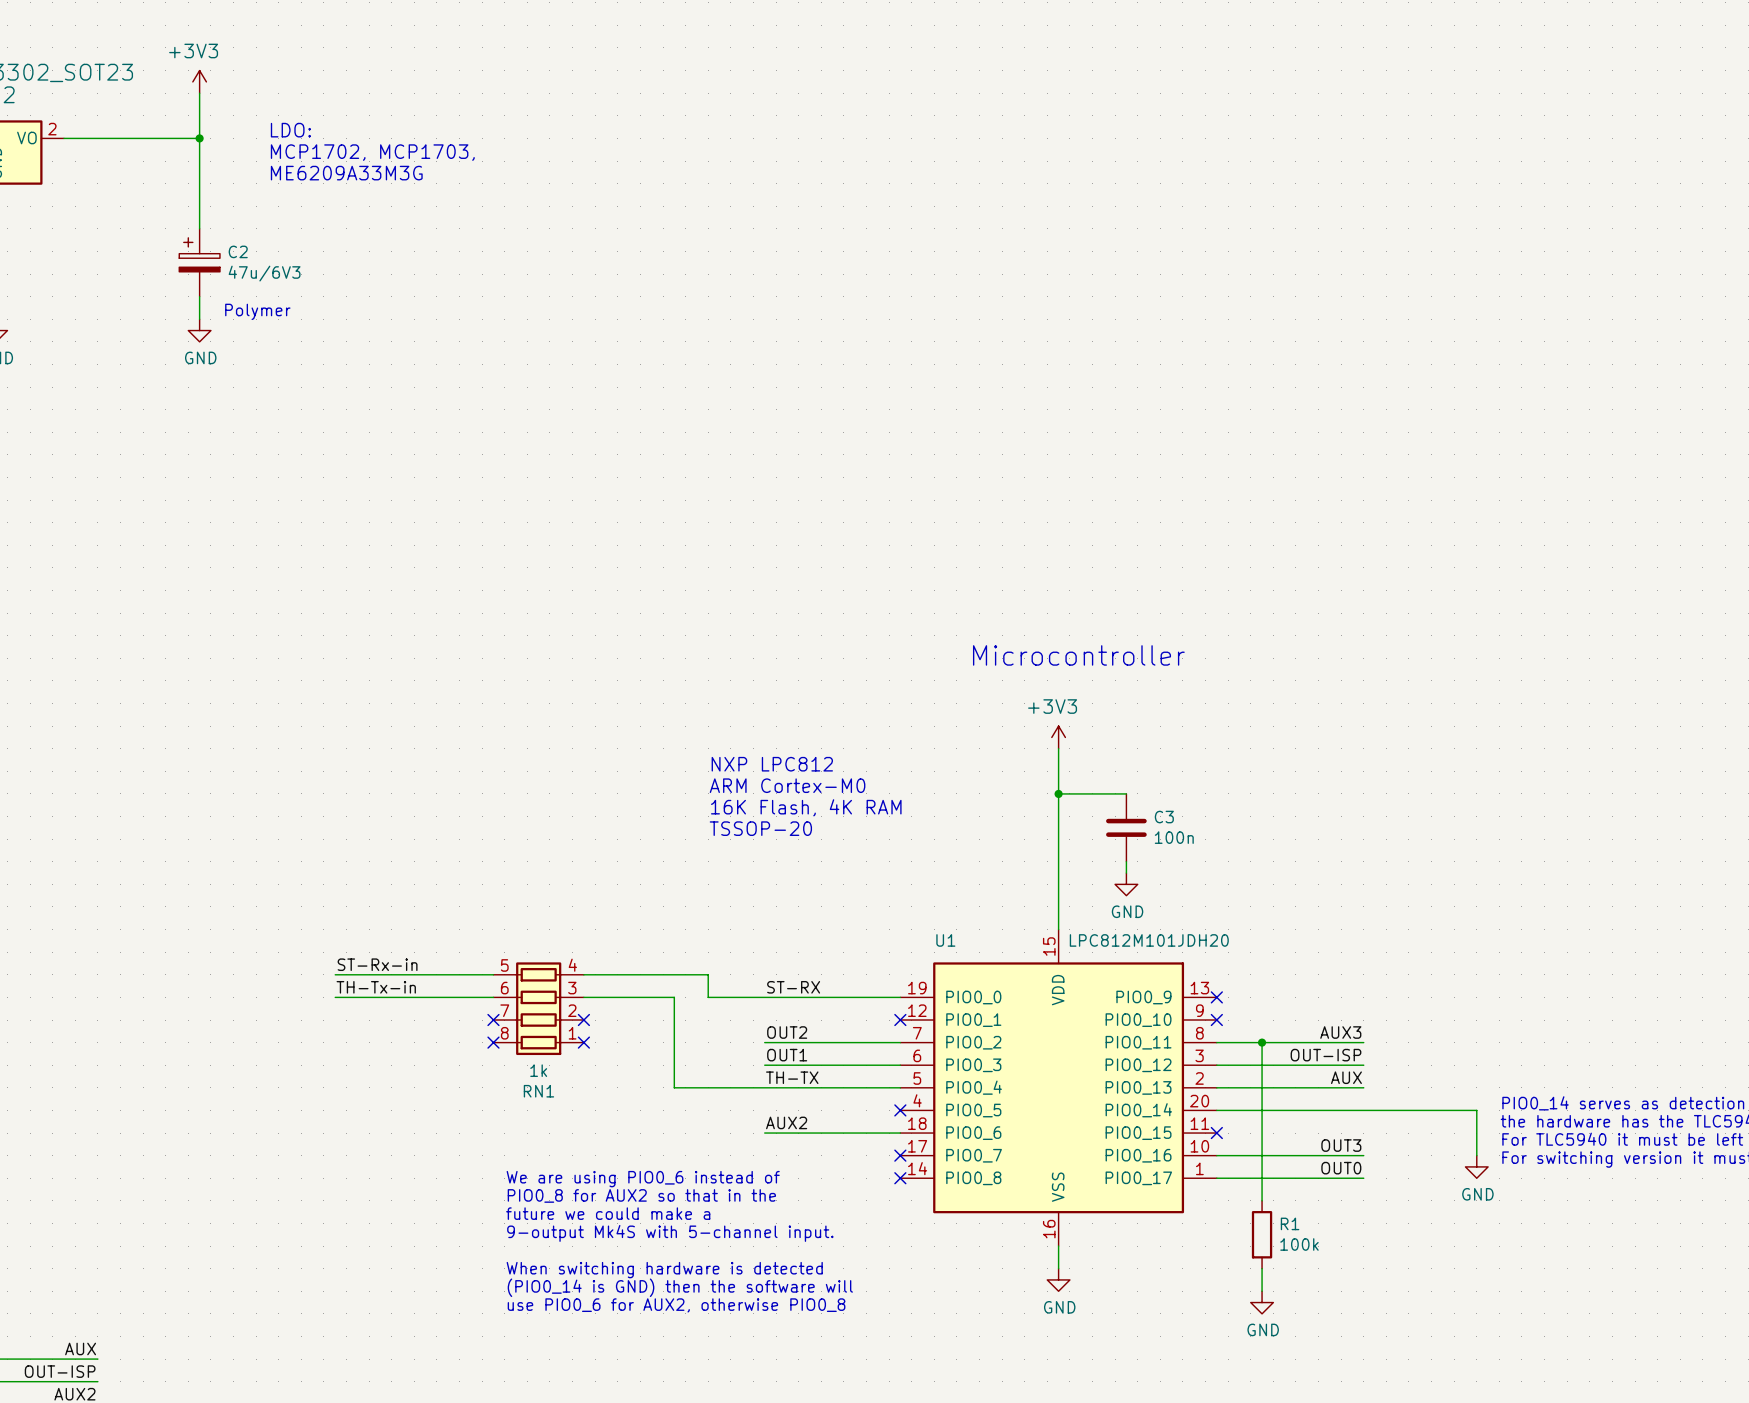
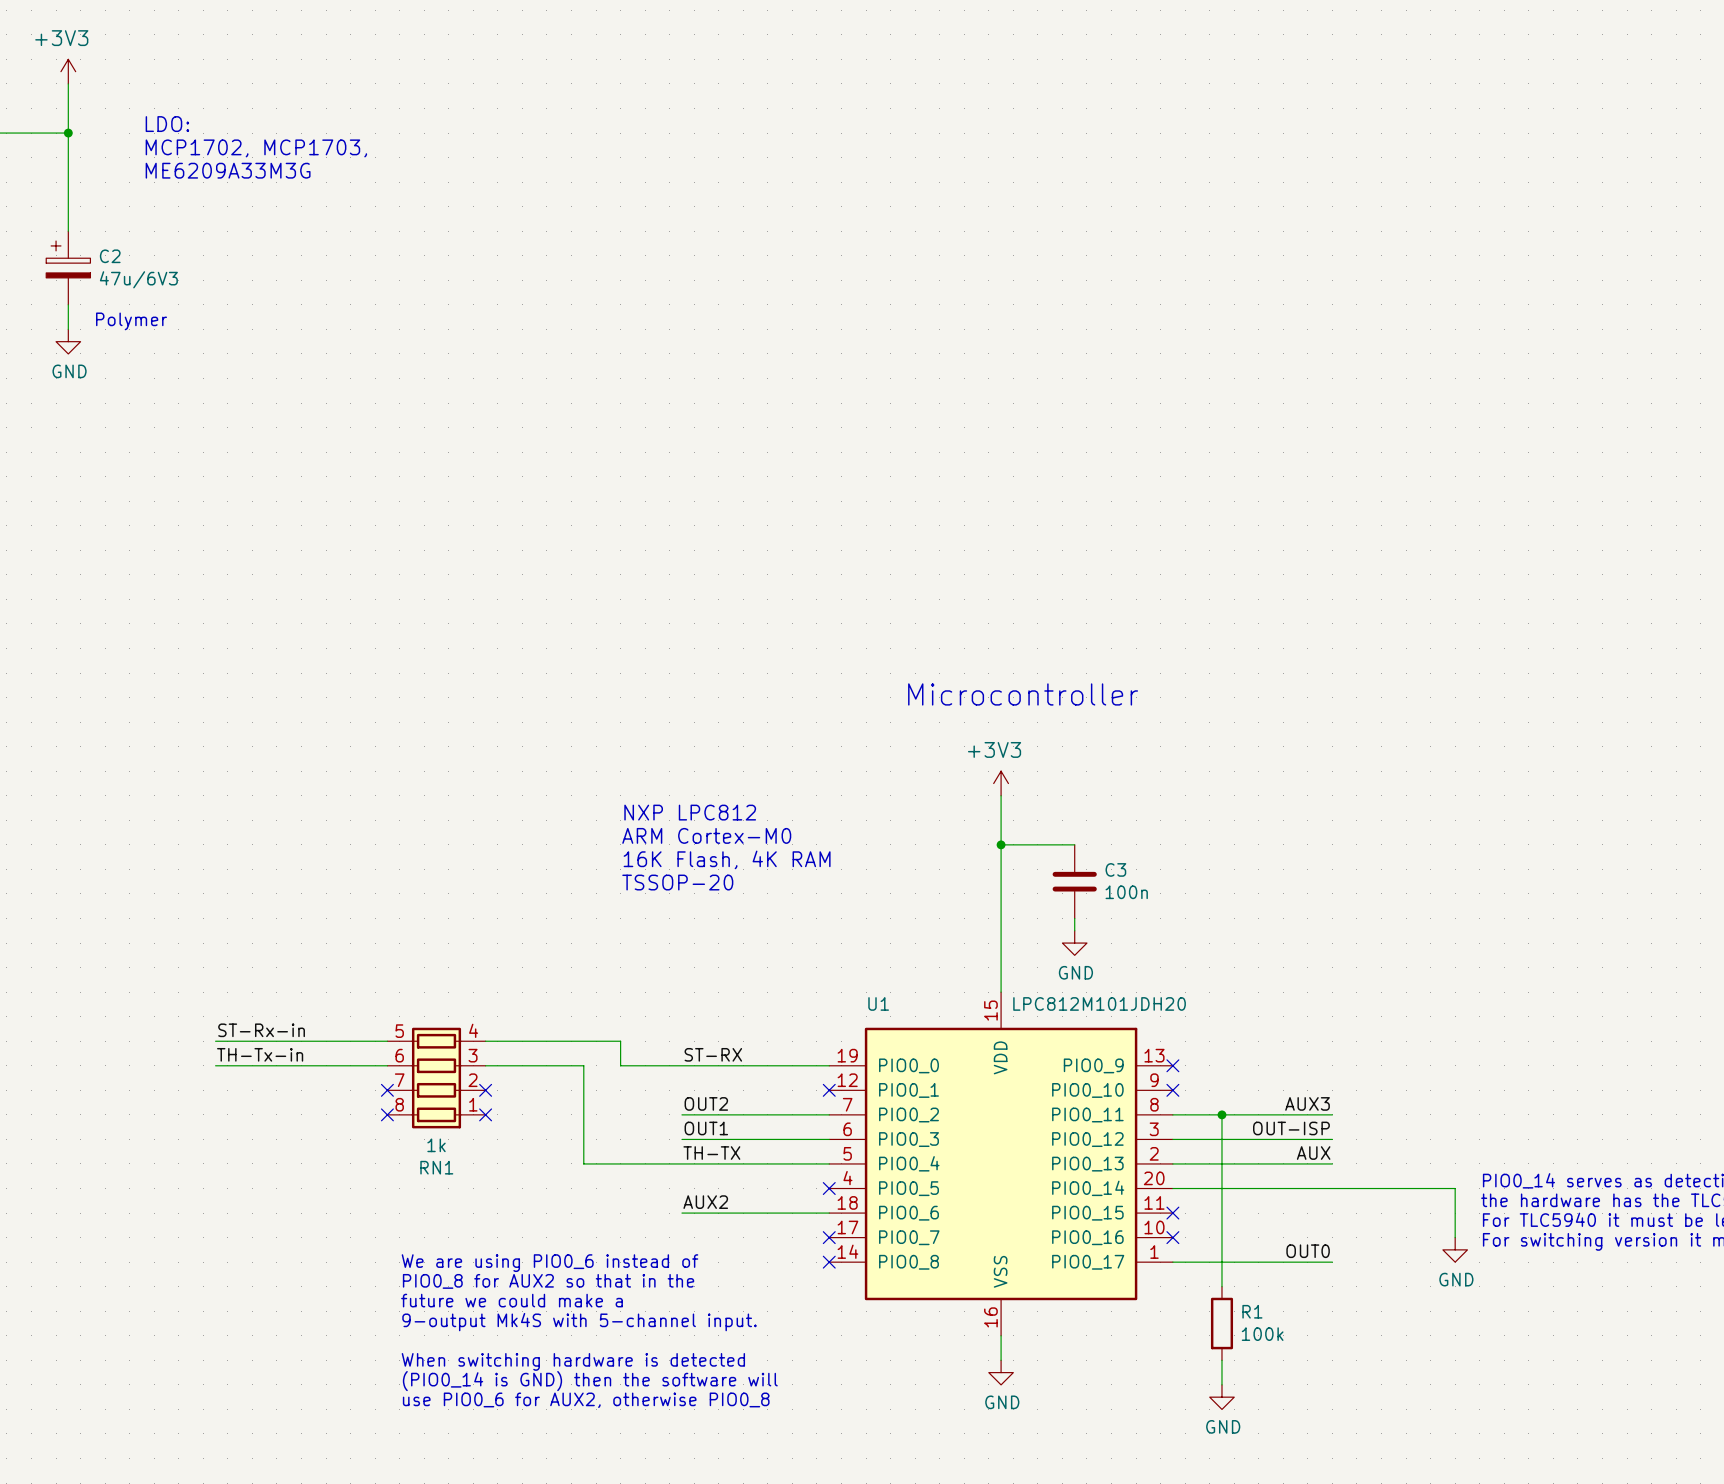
label: OUT3 (1341, 1145) -> none
wire: (1216, 1155) (1363, 1155) -> none
no-connect mark: none -> (1172, 1237)

